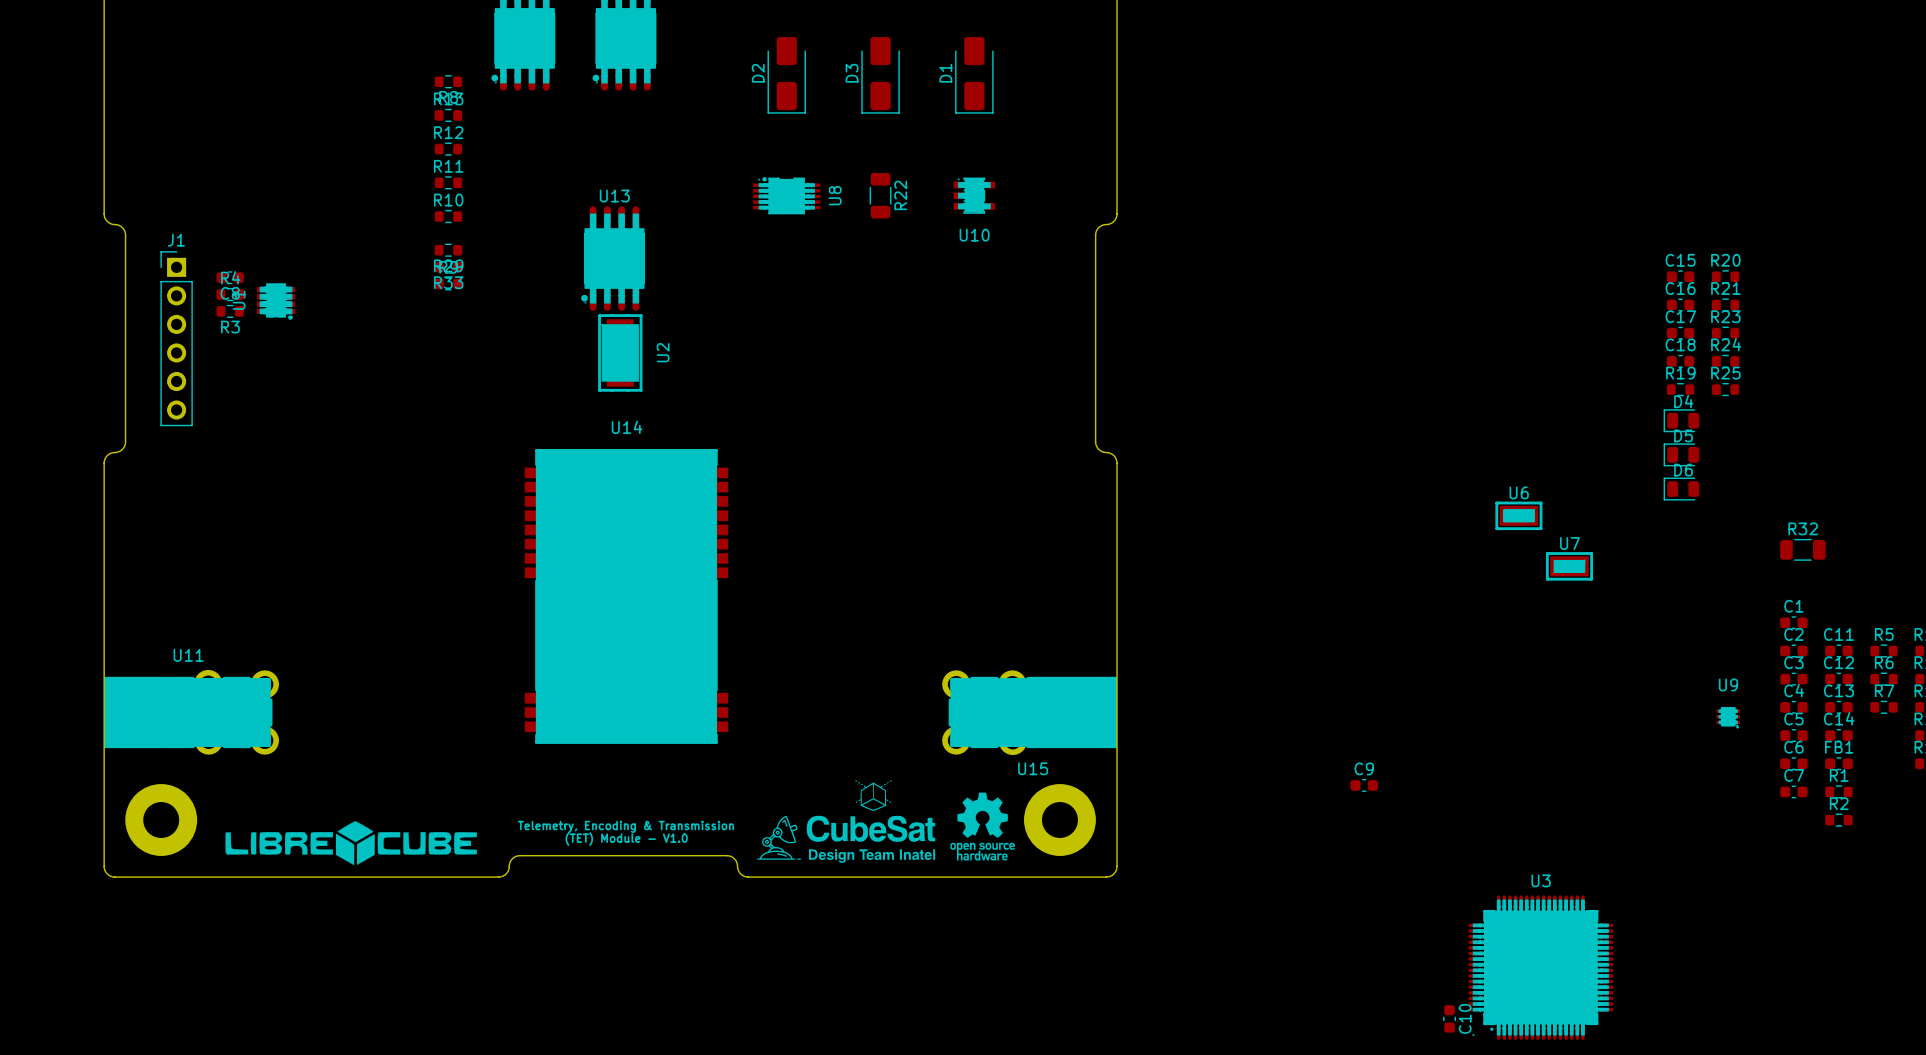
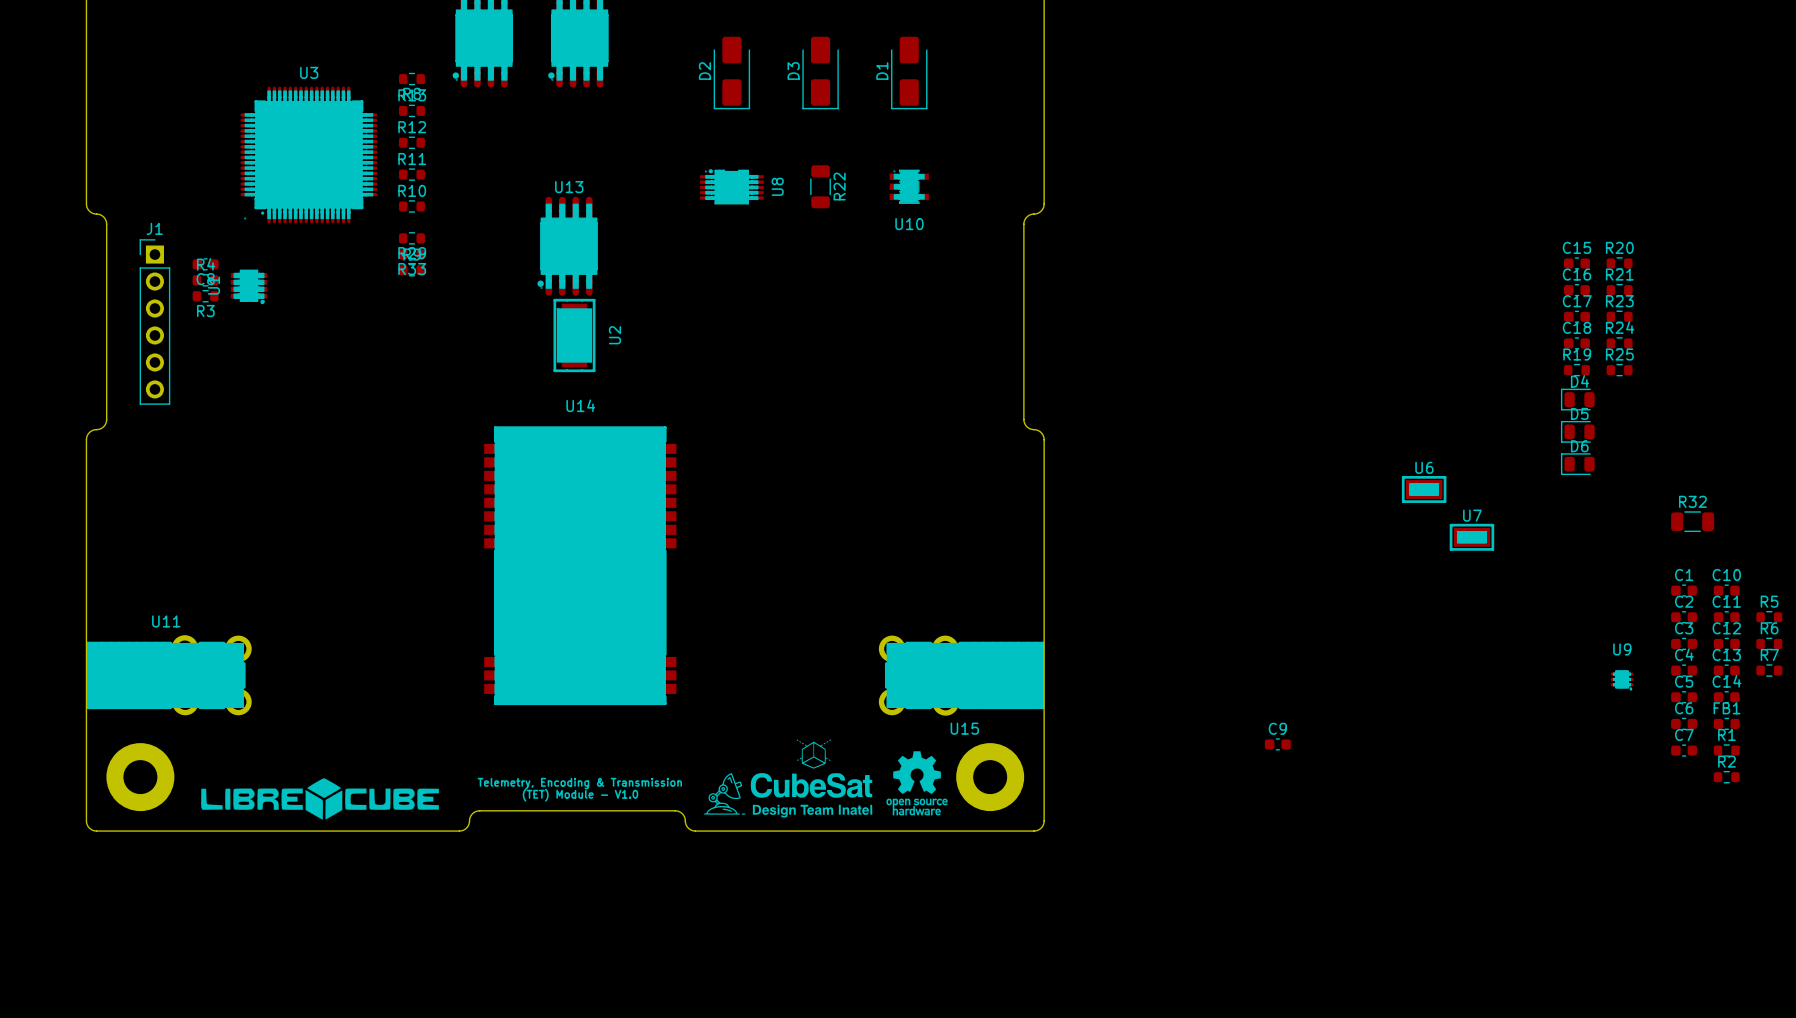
U3 position: (1540, 967) -> (308, 154)
C10 rotation: 0° (1449, 1018) -> 90° clockwise (1726, 590)
C10 position: (1449, 1018) -> (1726, 590)
C10 name position: C10 (1465, 1018) -> C10 (1726, 575)

